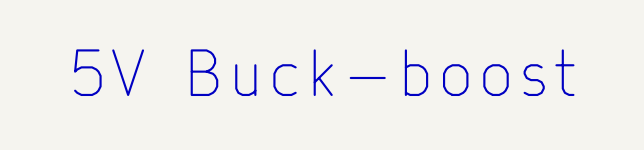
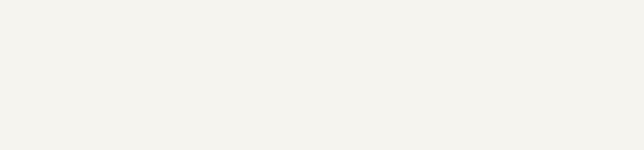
text: 5V Buck-boost (324, 72) -> none

